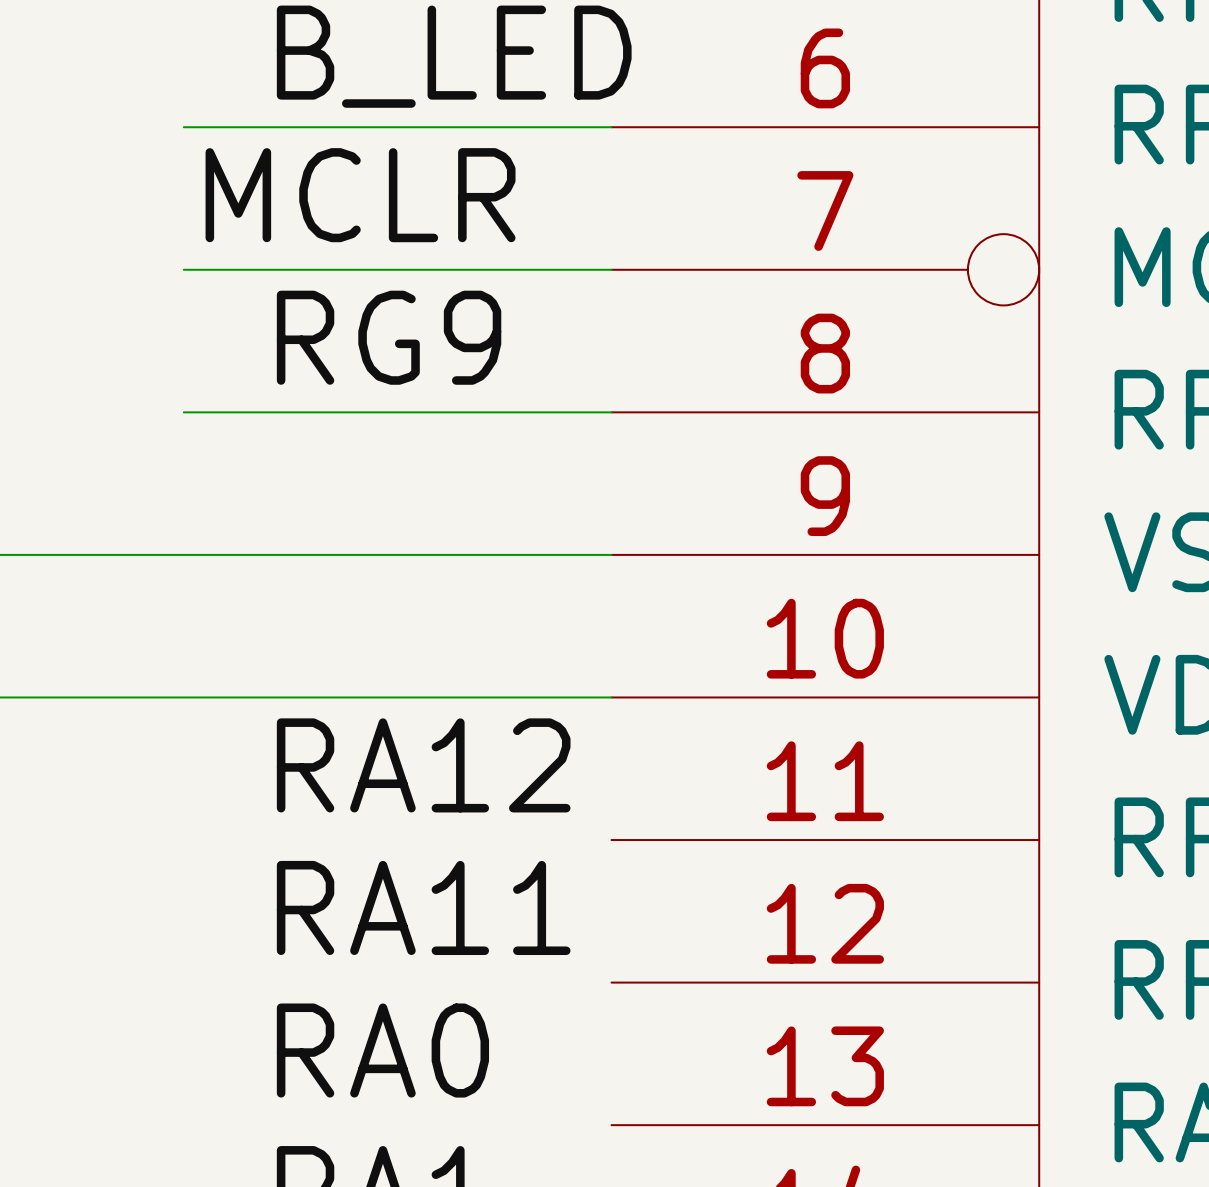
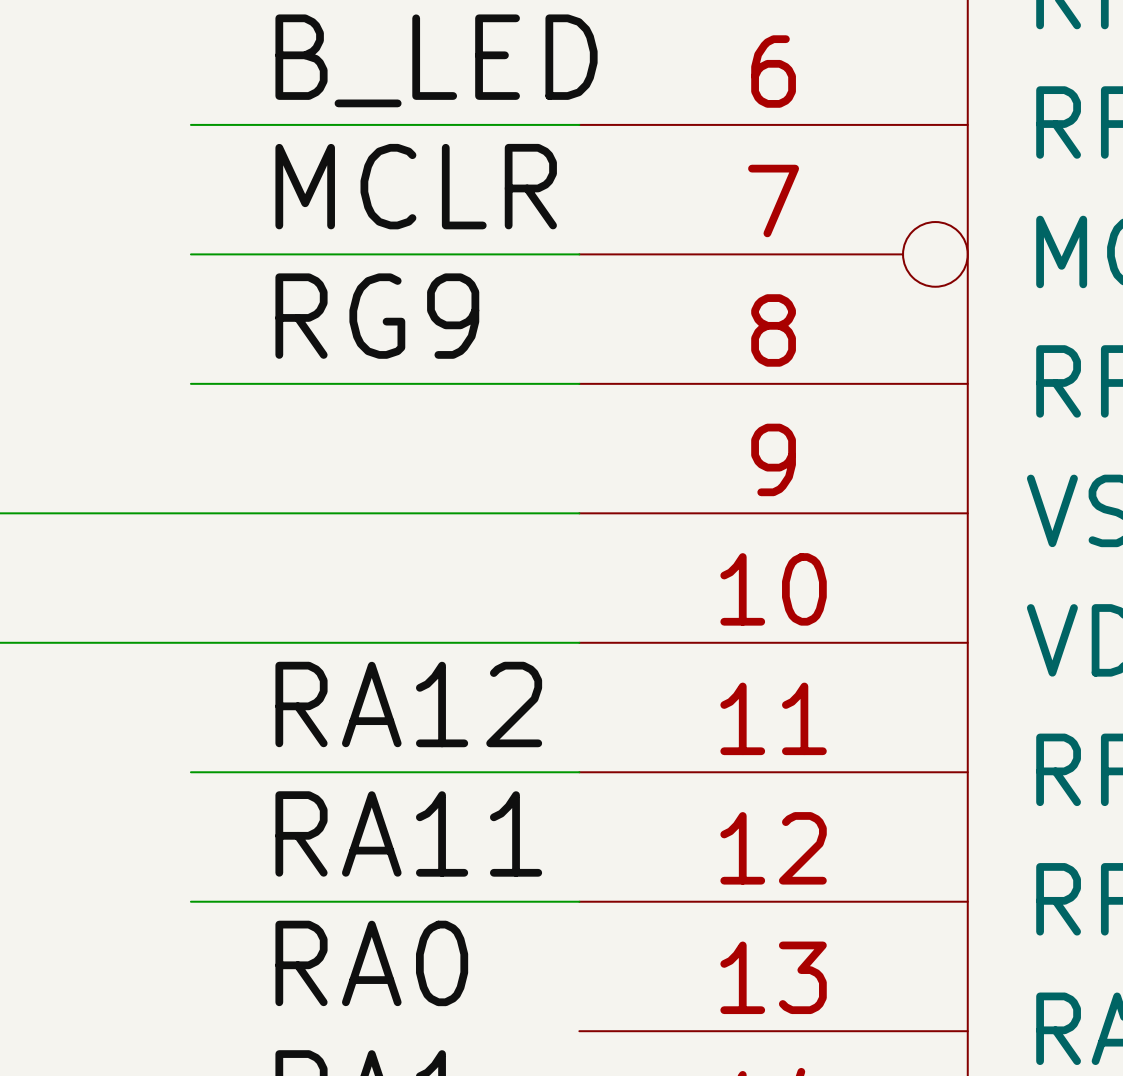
label position: MCLR (360, 195) -> MCLR (416, 186)
wire: none -> (190, 772) (579, 772)
wire: none -> (190, 901) (579, 901)

